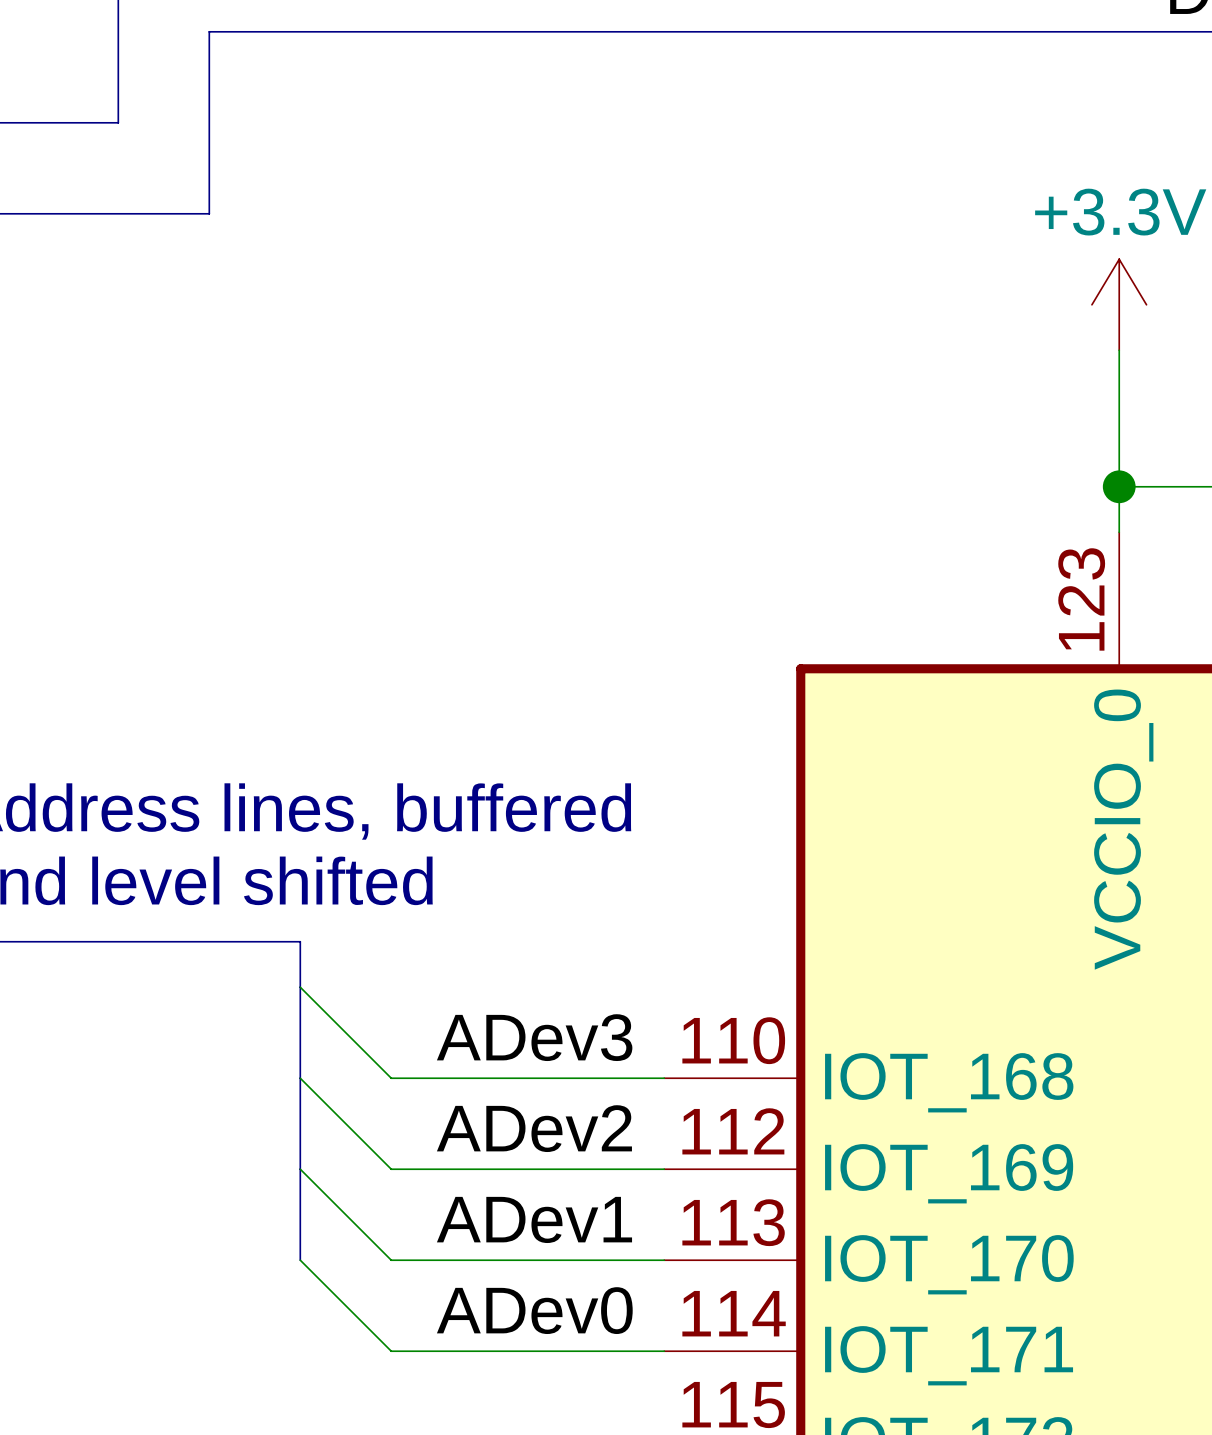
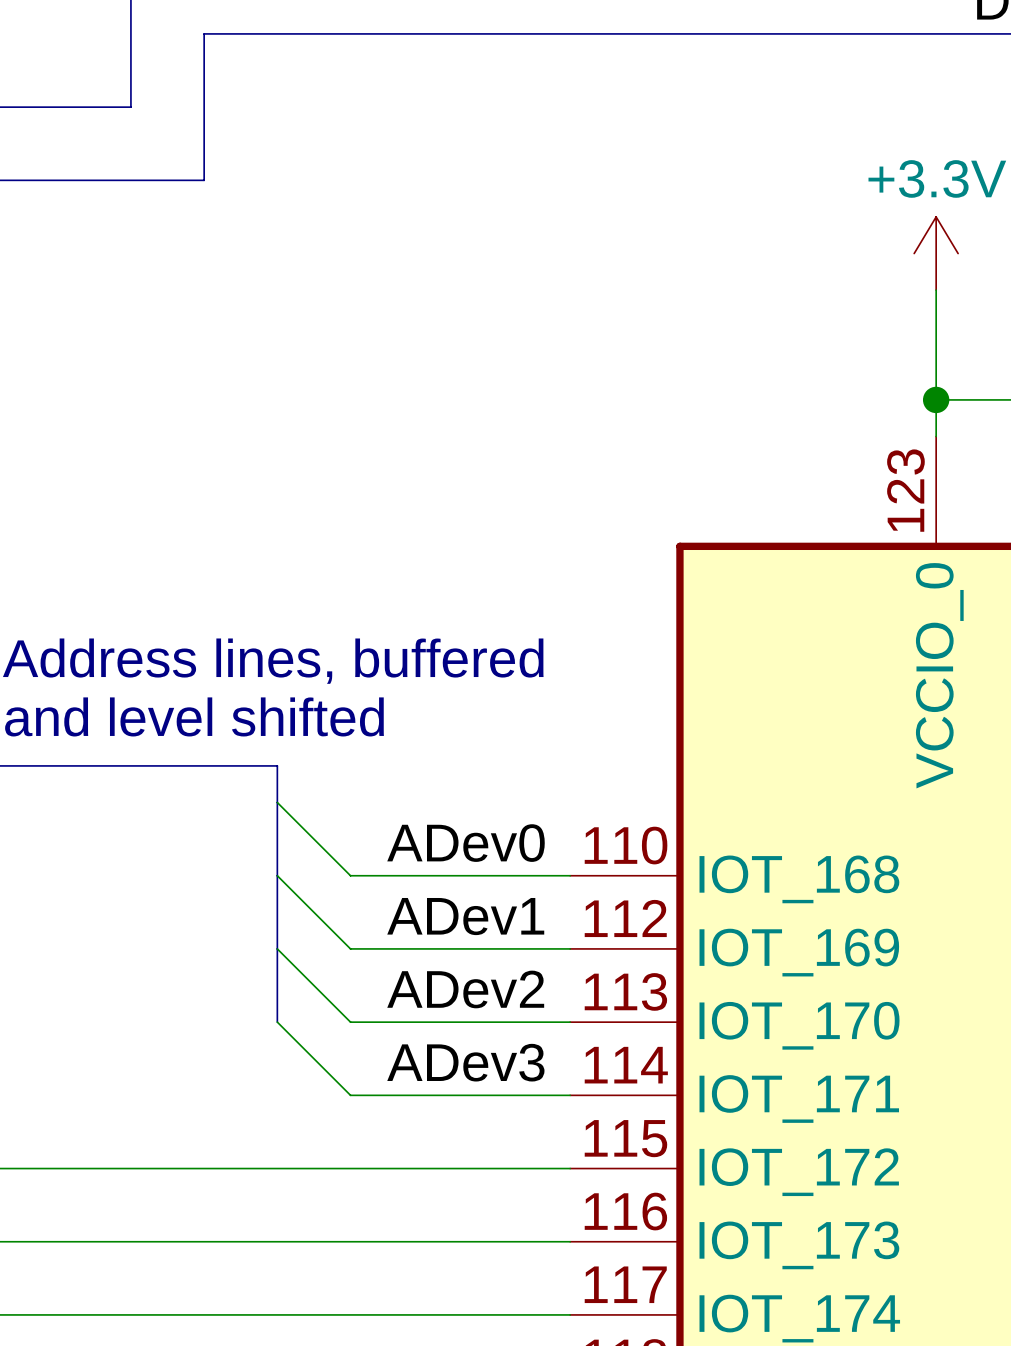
label: ADev3 (534, 1037) -> ADev0 (466, 843)
label: ADev2 (534, 1128) -> ADev1 (465, 916)
label: ADev1 (534, 1219) -> ADev2 (465, 989)
label: ADev0 (534, 1310) -> ADev3 (465, 1062)

